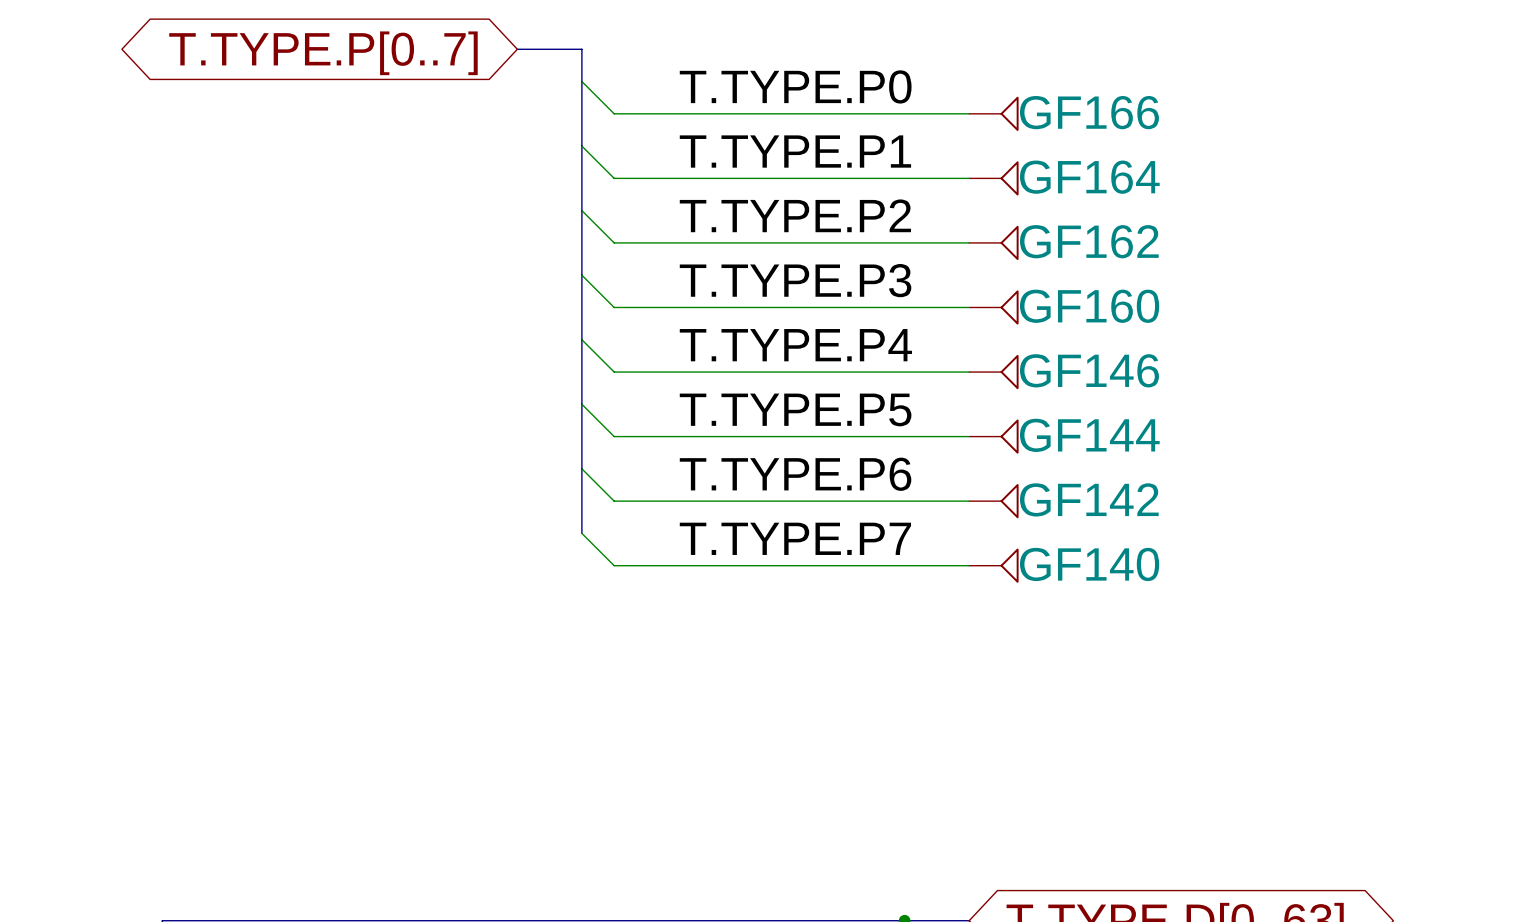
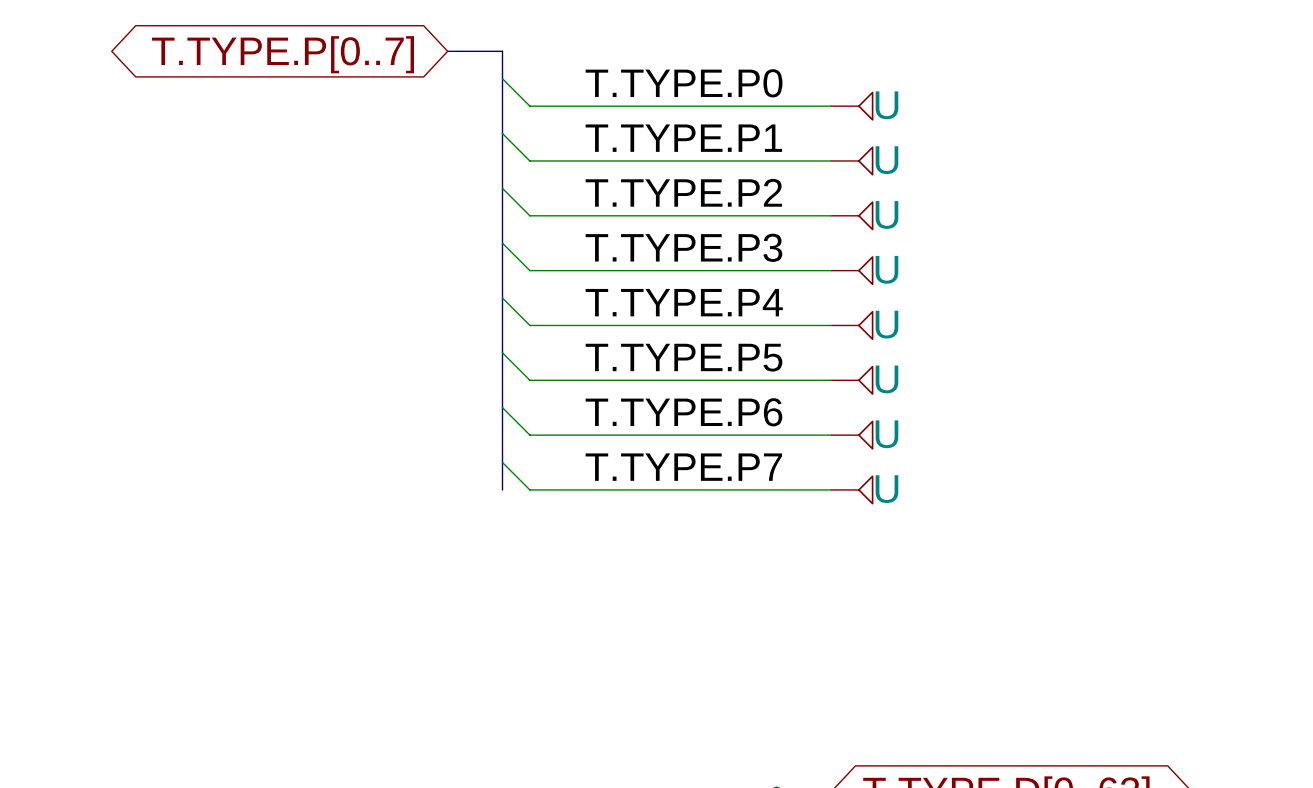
GF166 name: GF166 (1089, 112) -> U (886, 105)
GF164 name: GF164 (1089, 177) -> U (886, 160)
GF162 name: GF162 (1089, 241) -> U (886, 214)
GF160 name: GF160 (1089, 306) -> U (886, 269)
GF146 name: GF146 (1089, 370) -> U (886, 324)
GF144 name: GF144 (1089, 435) -> U (886, 379)
GF142 name: GF142 (1089, 499) -> U (886, 434)
bus: none -> (502, 462) (502, 489)
GF140 name: GF140 (1089, 564) -> U (886, 489)

